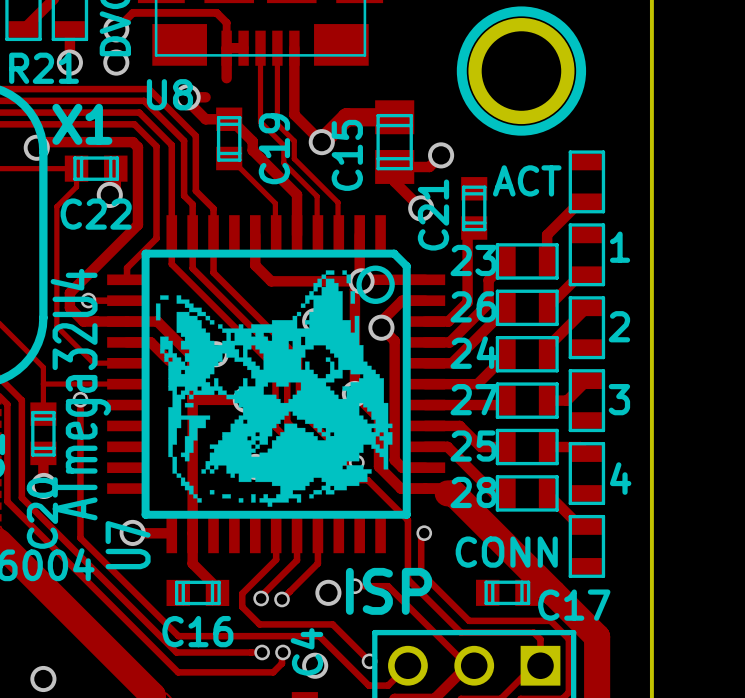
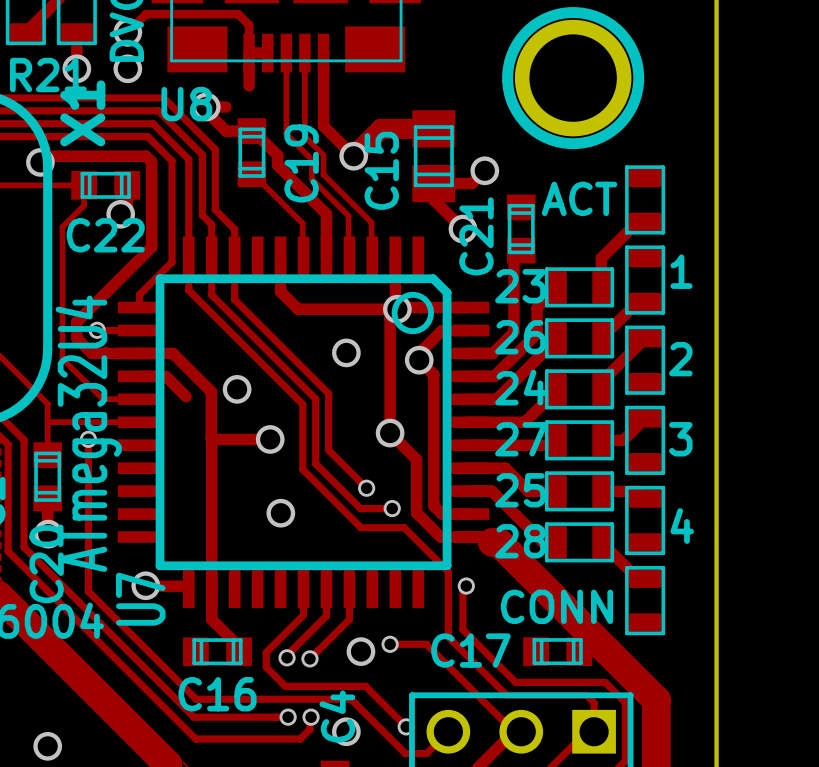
X1 name rotation: 0° (82, 124) -> 90° counterclockwise (82, 113)
drawing: [155, 270, 393, 507] -> none
text: ISP (388, 591) -> none
C17 name position: C17 (574, 605) -> C17 (470, 650)

